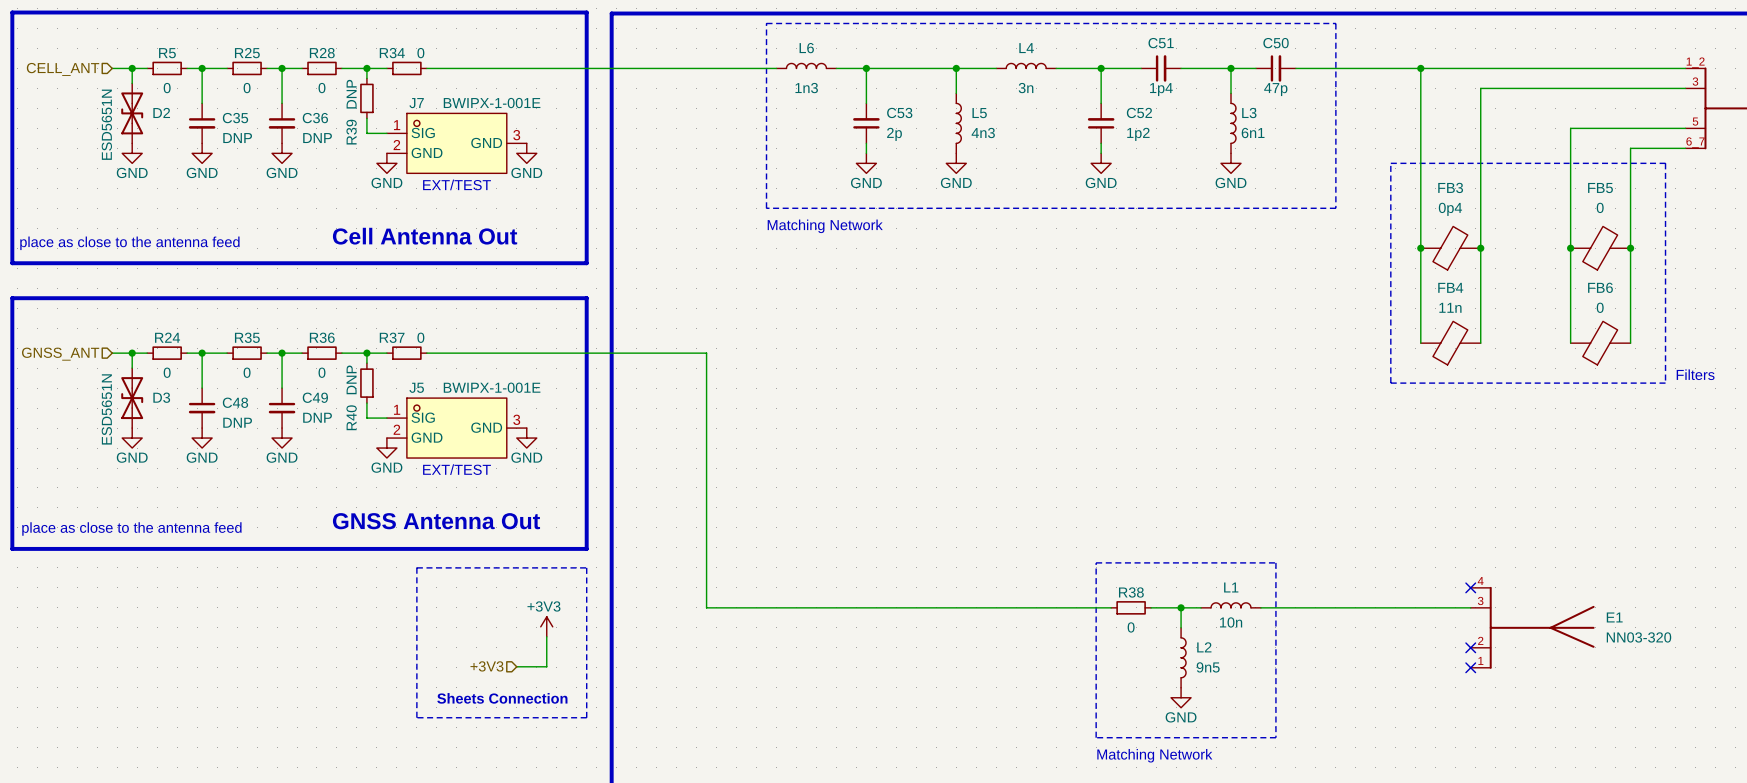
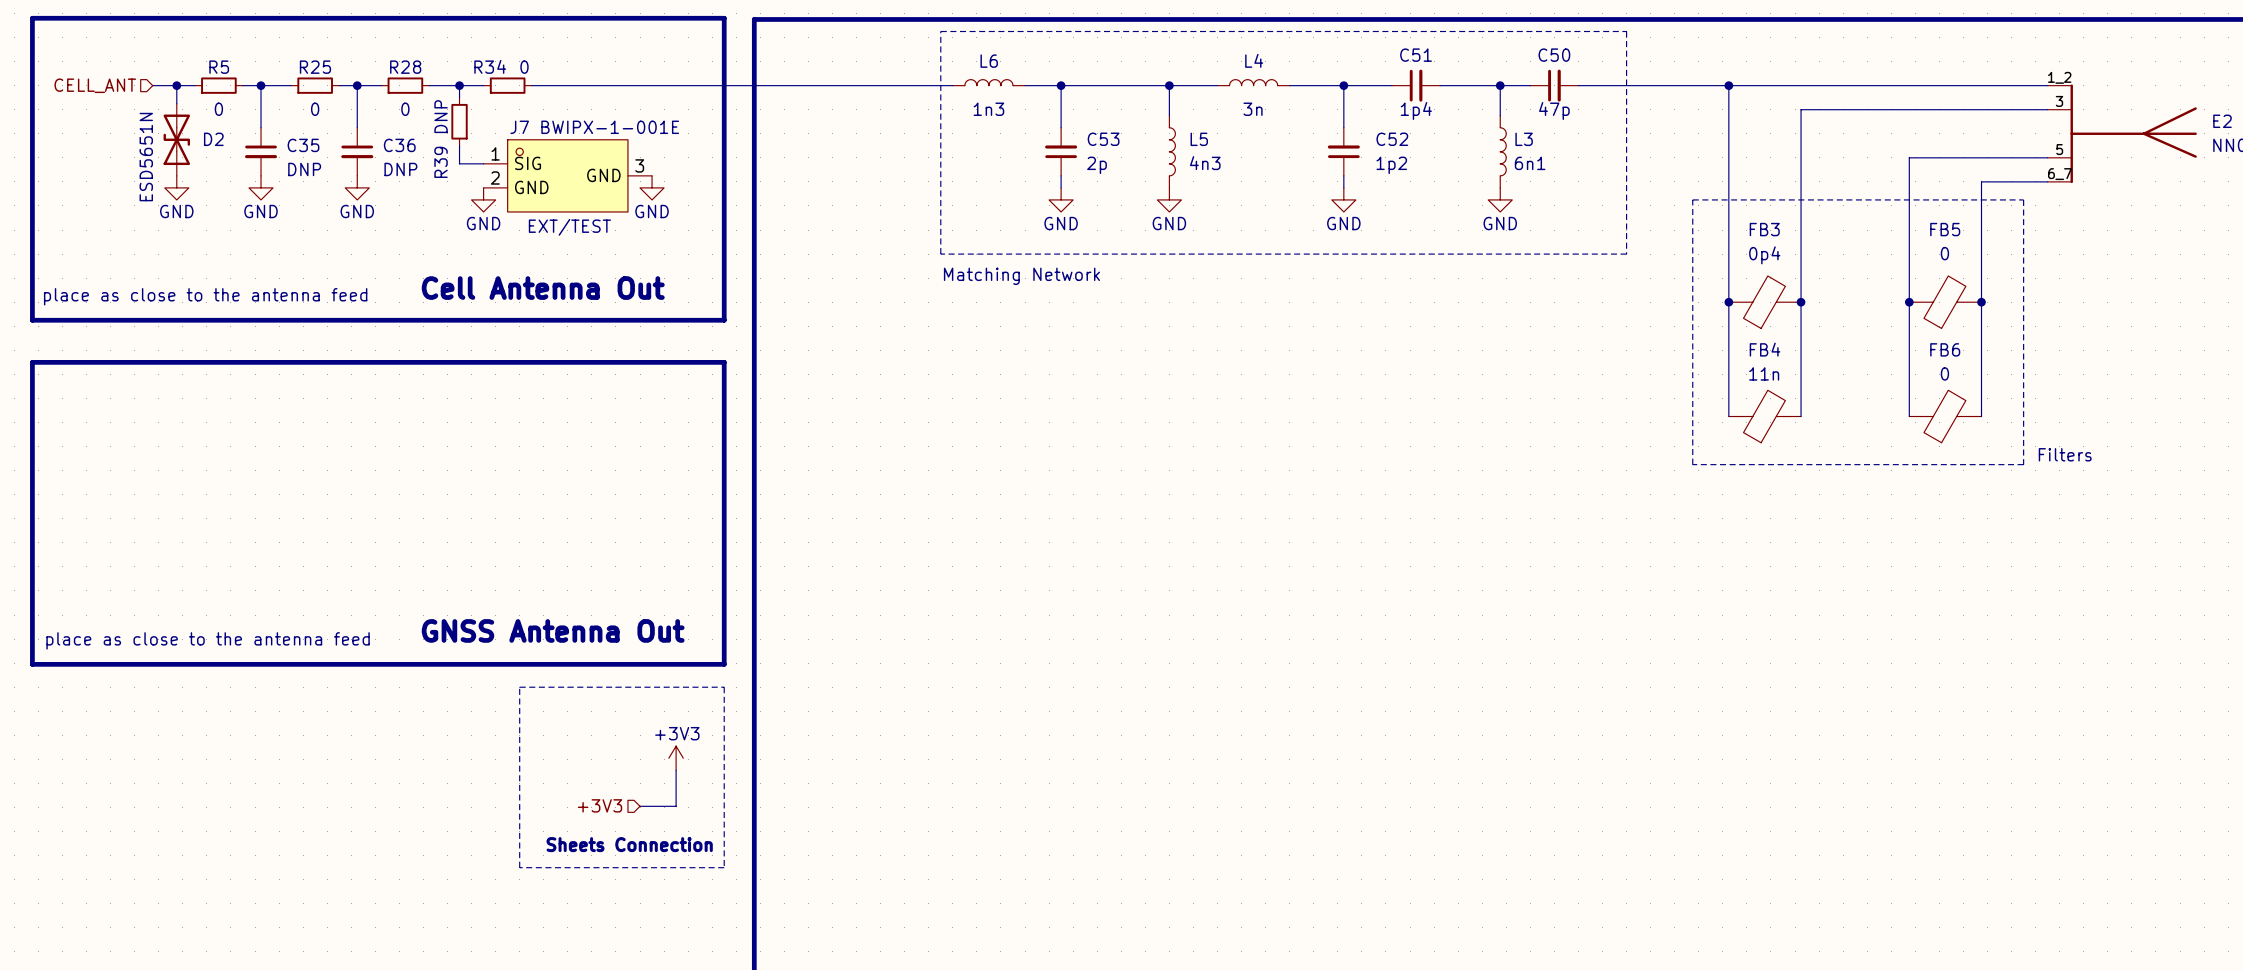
wire: (112, 353) (147, 353) -> none
wire: (132, 353) (132, 368) -> none
junction: (132, 353) -> none
R24: 0 (167, 353) -> none
wire: (187, 353) (227, 353) -> none
wire: (202, 353) (202, 388) -> none
junction: (202, 353) -> none
R35: 0 (247, 353) -> none
wire: (267, 353) (302, 353) -> none
wire: (282, 353) (282, 388) -> none
junction: (282, 353) -> none
R36: 0 (321, 353) -> none
wire: (341, 353) (386, 353) -> none
wire: (366, 353) (366, 363) -> none
junction: (366, 353) -> none
R37: 0 (406, 353) -> none
wire: (426, 353) (706, 353) (706, 607) (1111, 607) -> none
hierarchical label: GNSS_ANT (60, 354) -> none
R40: DNP (366, 383) -> none
D3: ESD5651N (132, 398) -> none
wire: (366, 403) (366, 418) (386, 418) -> none
C48: DNP (202, 408) -> none
C49: DNP (282, 408) -> none
J5: BWIPX-1-001E (456, 428) -> none
power symbol: GND (132, 438) -> none
power symbol: GND (202, 438) -> none
power symbol: GND (282, 438) -> none
power symbol: GND (526, 438) -> none
power symbol: GND (386, 448) -> none
text: EXT/TEST (457, 469) -> none
line: (1096, 562) (1275, 562) (1275, 737) (1096, 737) (1096, 562) -> none
no-connect mark: (1470, 587) -> none
L1: 10n (1231, 605) -> none
R38: 0 (1131, 607) -> none
wire: (1151, 607) (1201, 607) -> none
wire: (1181, 607) (1181, 627) -> none
junction: (1181, 607) -> none
wire: (1260, 607) (1470, 607) -> none
E1: NN03-320 (1532, 627) -> none
no-connect mark: (1470, 647) -> none
L2: 9n5 (1183, 657) -> none
no-connect mark: (1470, 667) -> none
power symbol: GND (1181, 697) -> none
text: Matching Network (1154, 755) -> none

